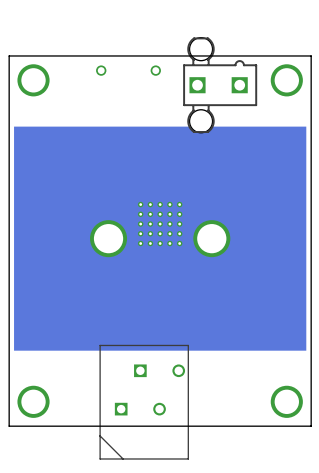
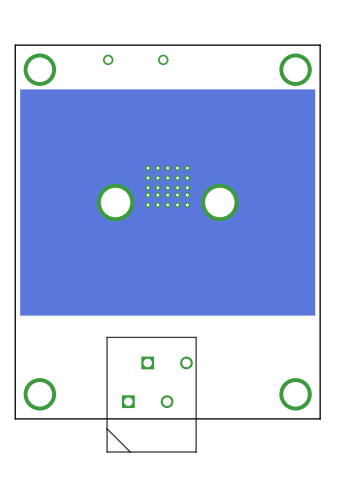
part: (220, 85) -> none
via: none -> (148, 168)
via: none -> (157, 168)
via: none -> (167, 168)
via: none -> (177, 168)
via: none -> (187, 168)
via: none -> (148, 177)
via: none -> (157, 177)
via: none -> (167, 177)
via: none -> (177, 177)
via: none -> (187, 177)
via: none -> (148, 187)
via: none -> (157, 187)
via: none -> (167, 187)
via: none -> (177, 187)
via: none -> (187, 187)
via: (140, 224) -> none
via: (150, 224) -> none
via: (160, 224) -> none
via: (169, 224) -> none
via: (179, 224) -> none
via: (140, 233) -> none
via: (150, 233) -> none
via: (160, 233) -> none
via: (169, 233) -> none
via: (179, 233) -> none
part position: (160, 238) -> (167, 202)
via: (140, 243) -> none
via: (150, 243) -> none
via: (160, 243) -> none
via: (169, 243) -> none
via: (179, 243) -> none

